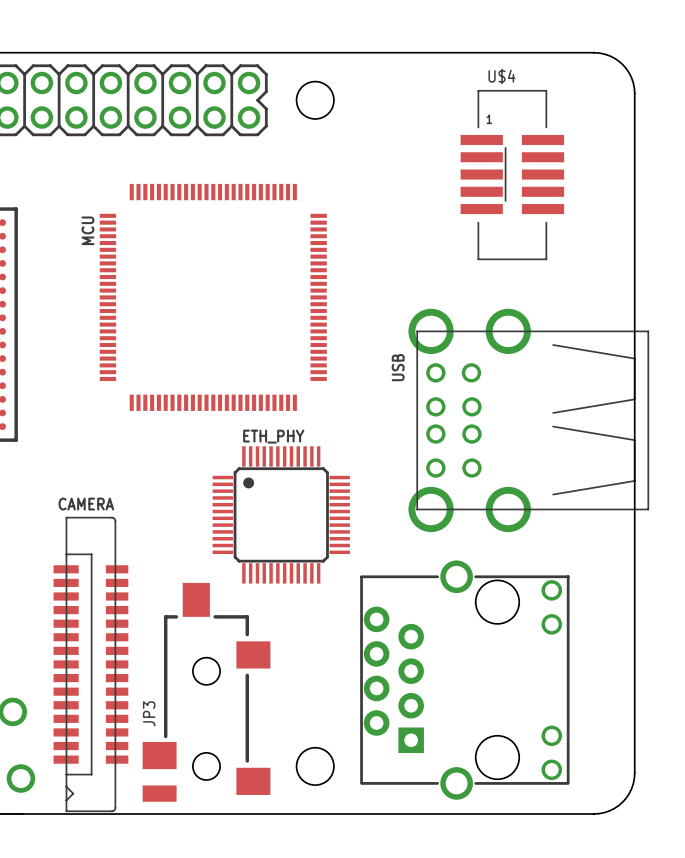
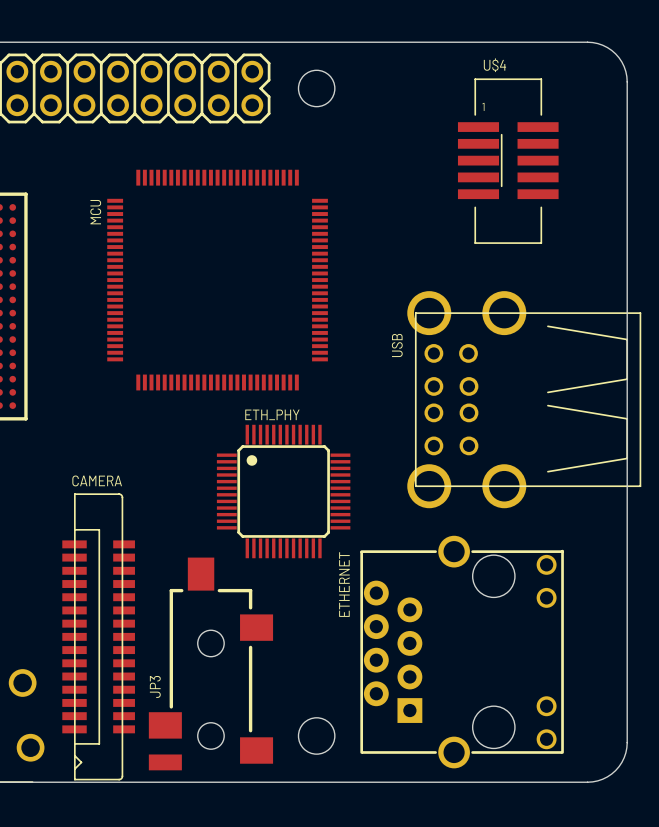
ETHERNET name: none -> ETHERNET (344, 584)

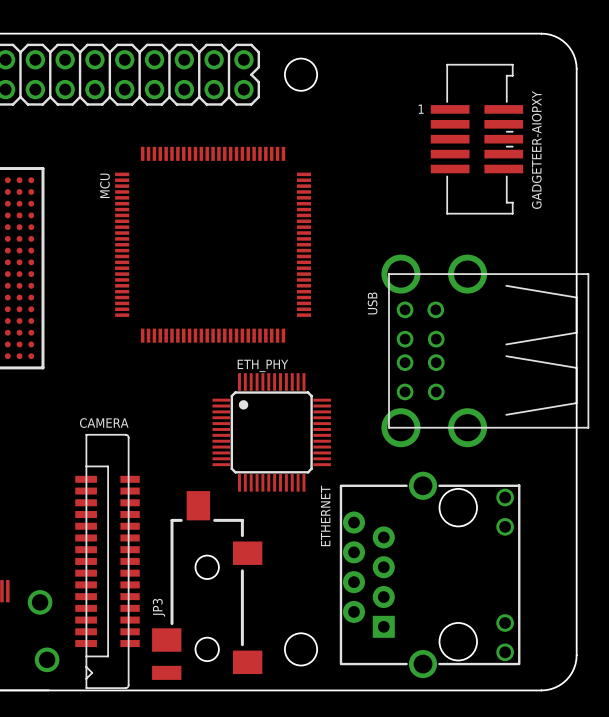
U$4: (508, 161) -> none
GADGETEER-AIOPXY: none -> (476, 139)

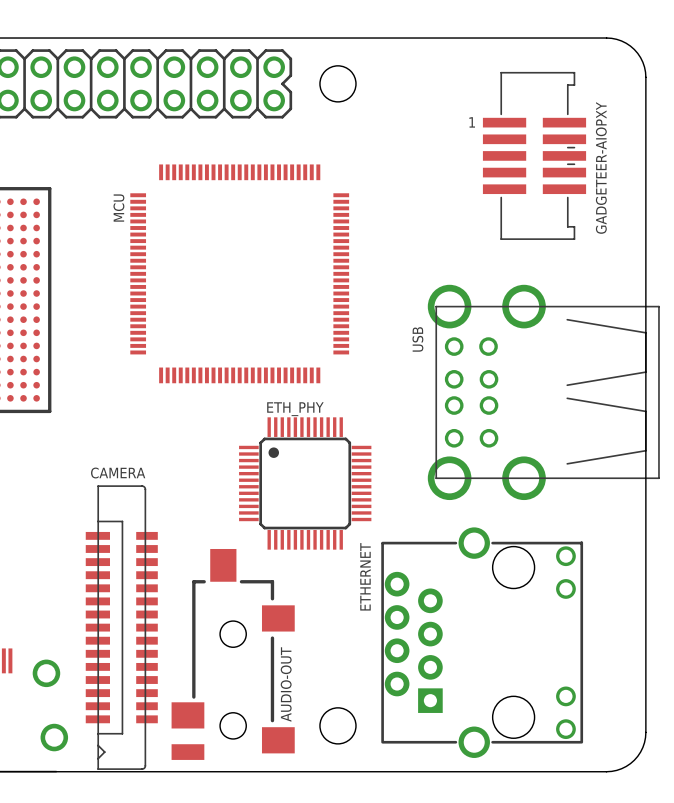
JP3 name: JP3 (158, 607) -> AUDIO-OUT (286, 684)

